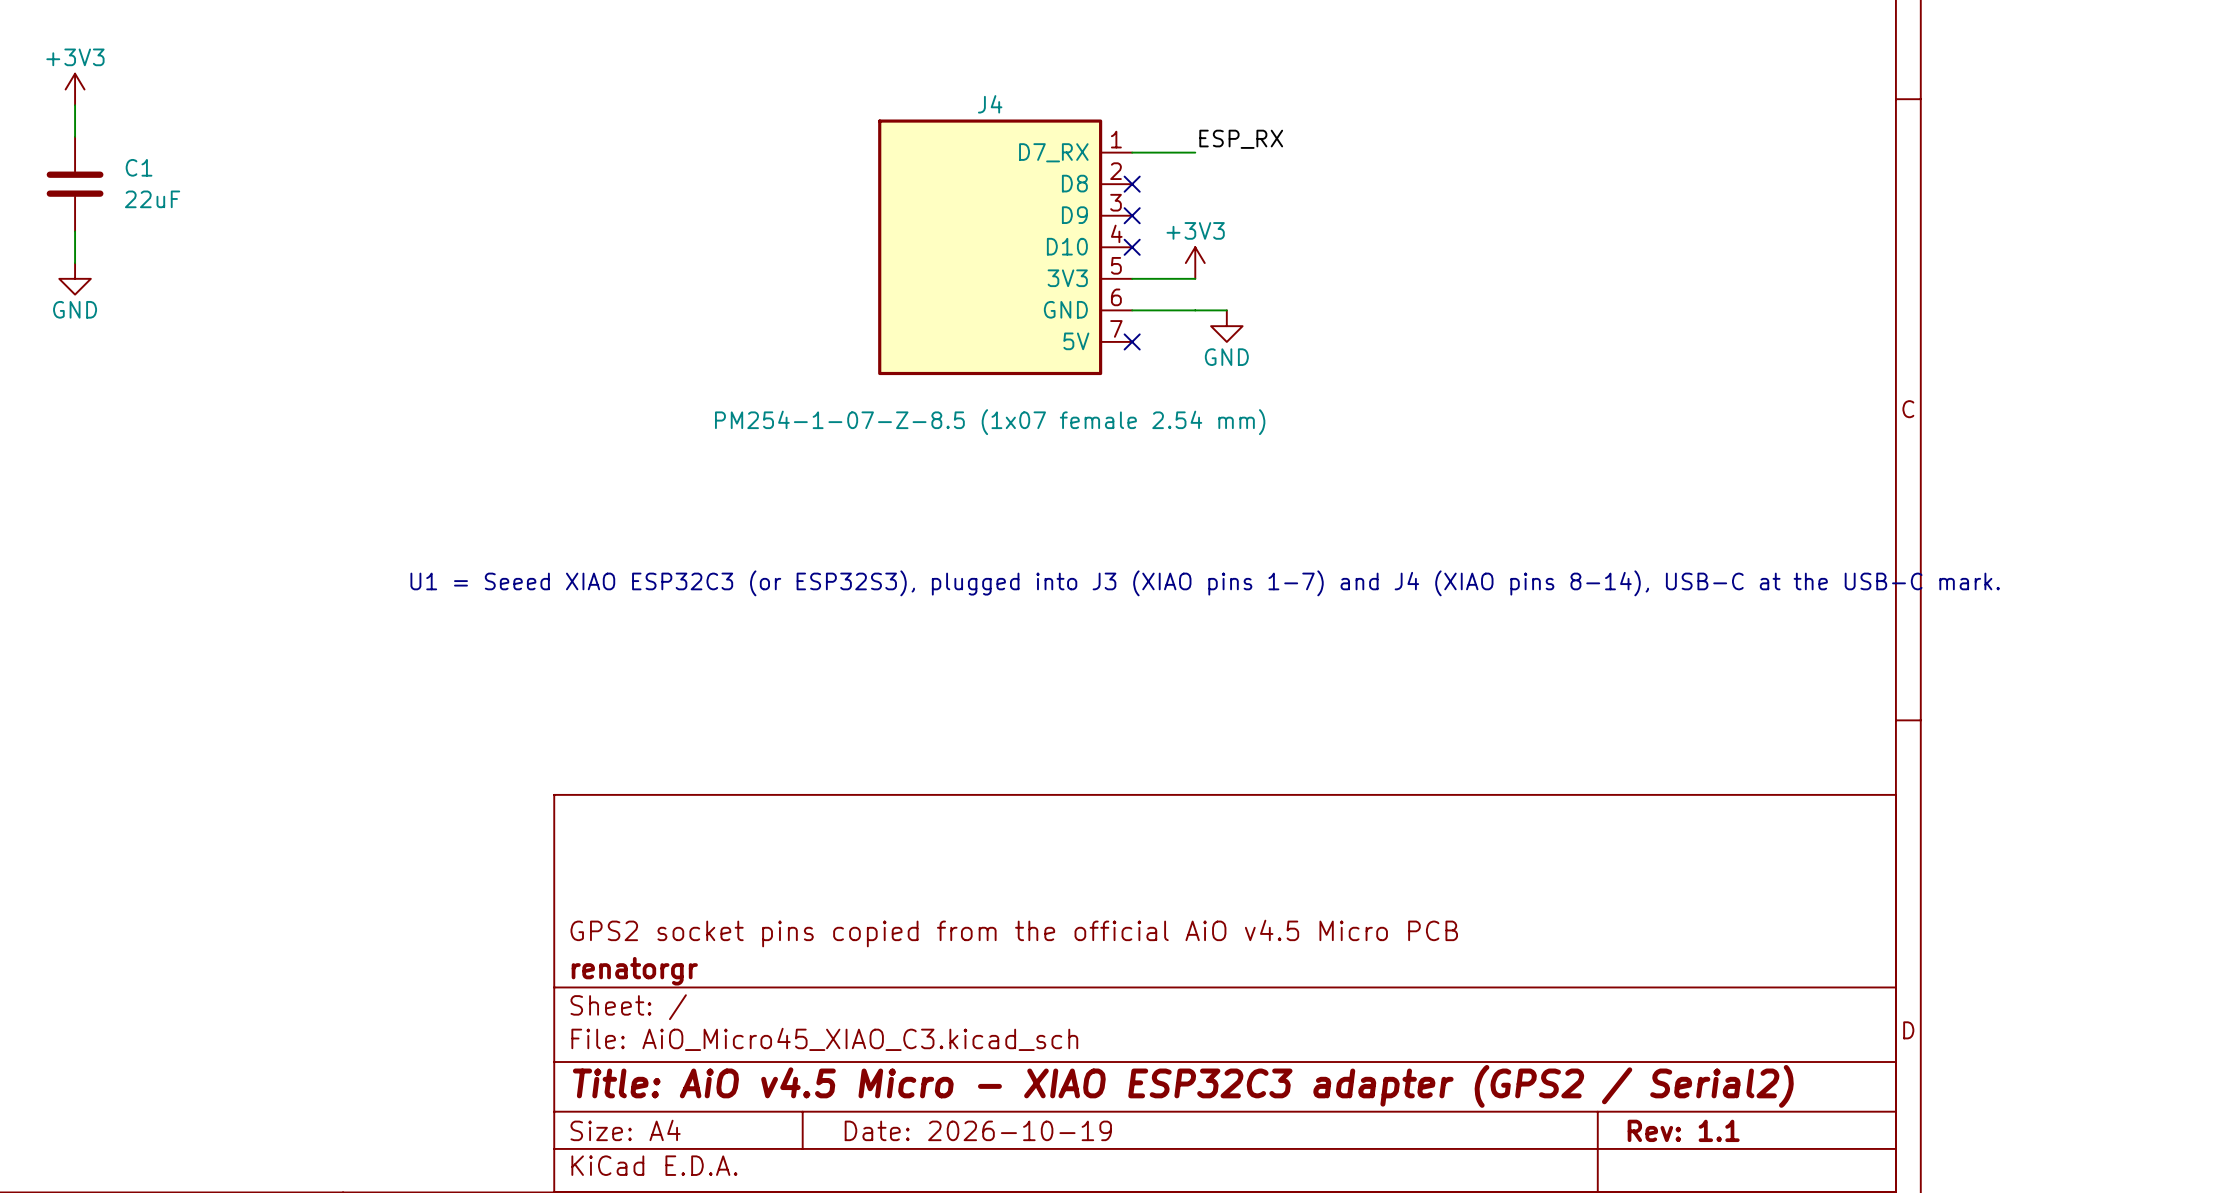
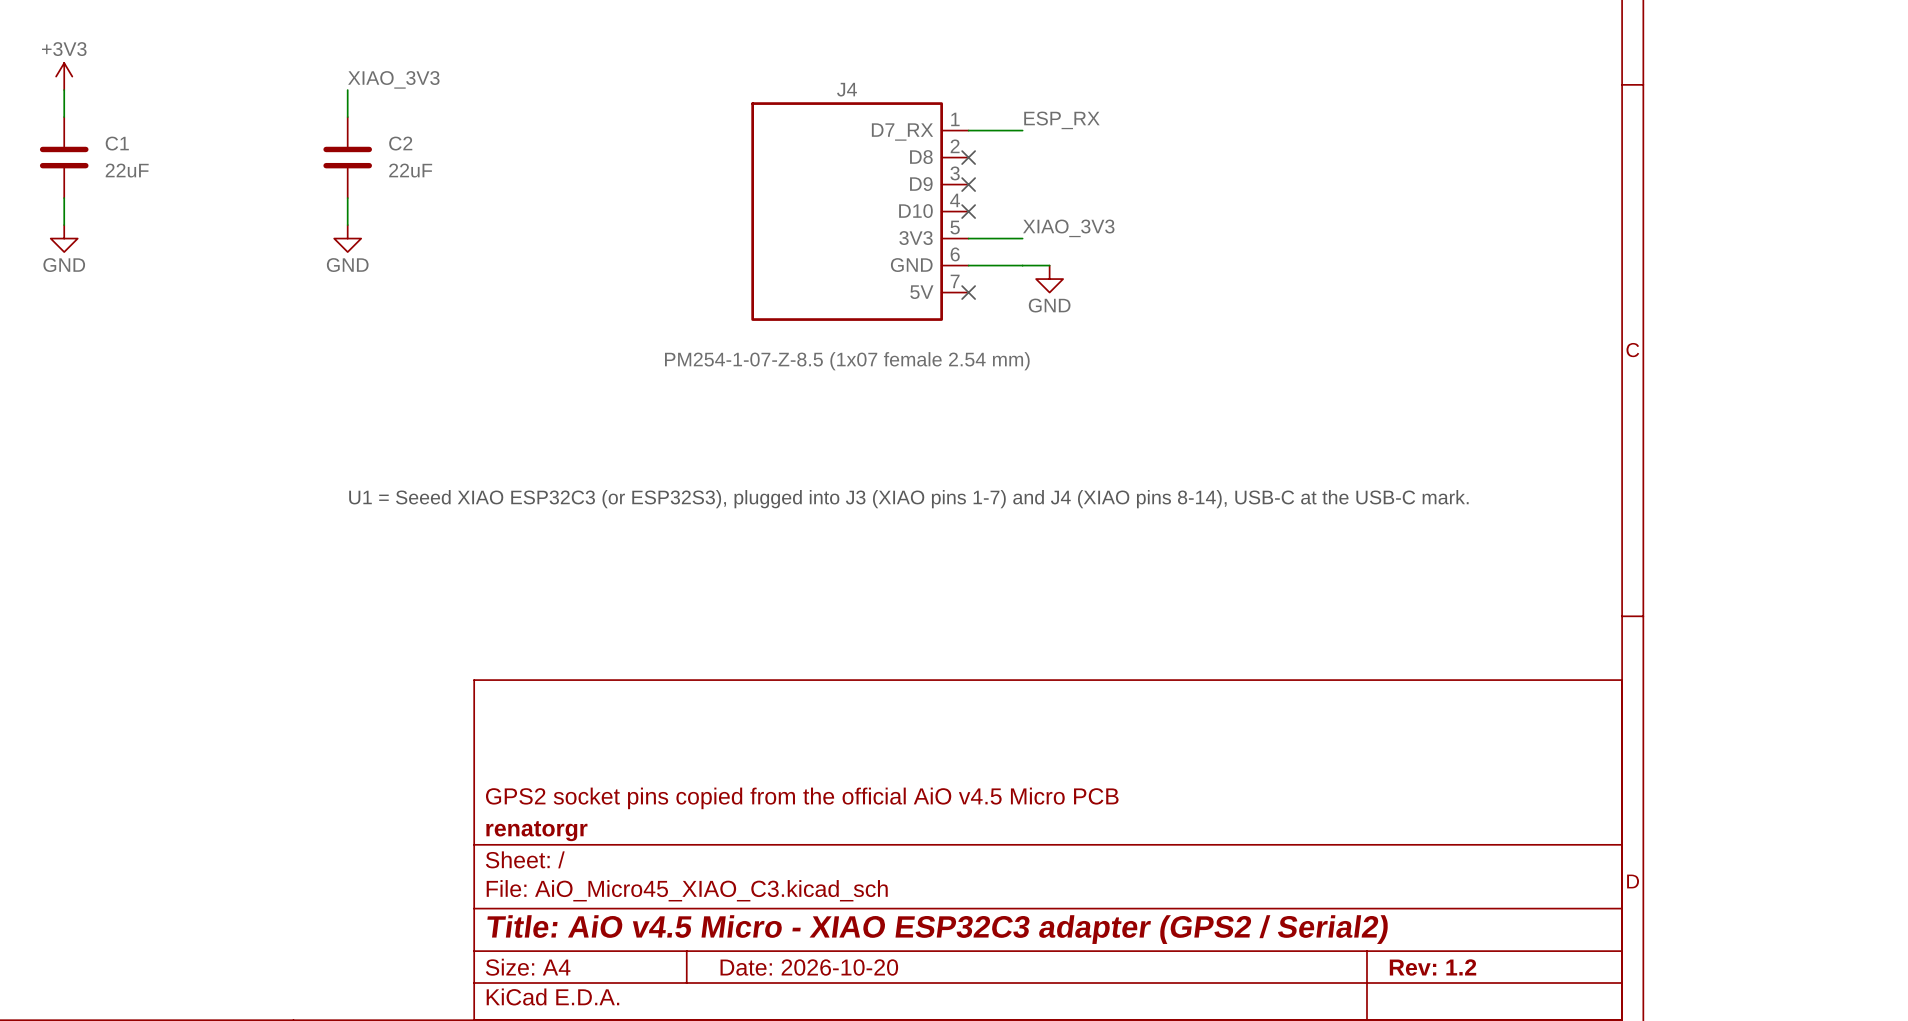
label: none -> XIAO_3V3 (393, 79)
wire: none -> (347, 90) (347, 117)
C2: none -> 22uF (347, 157)
wire: none -> (347, 198) (347, 225)
power symbol: +3V3 (1195, 263) -> none
label: none -> XIAO_3V3 (1068, 228)
power symbol: none -> GND (347, 238)
title block: Date: 2026-10-19 (978, 1130) -> Date: 2026-10-20 (809, 967)
title block: Rev: 1.1 (1683, 1130) -> Rev: 1.2 (1433, 967)

